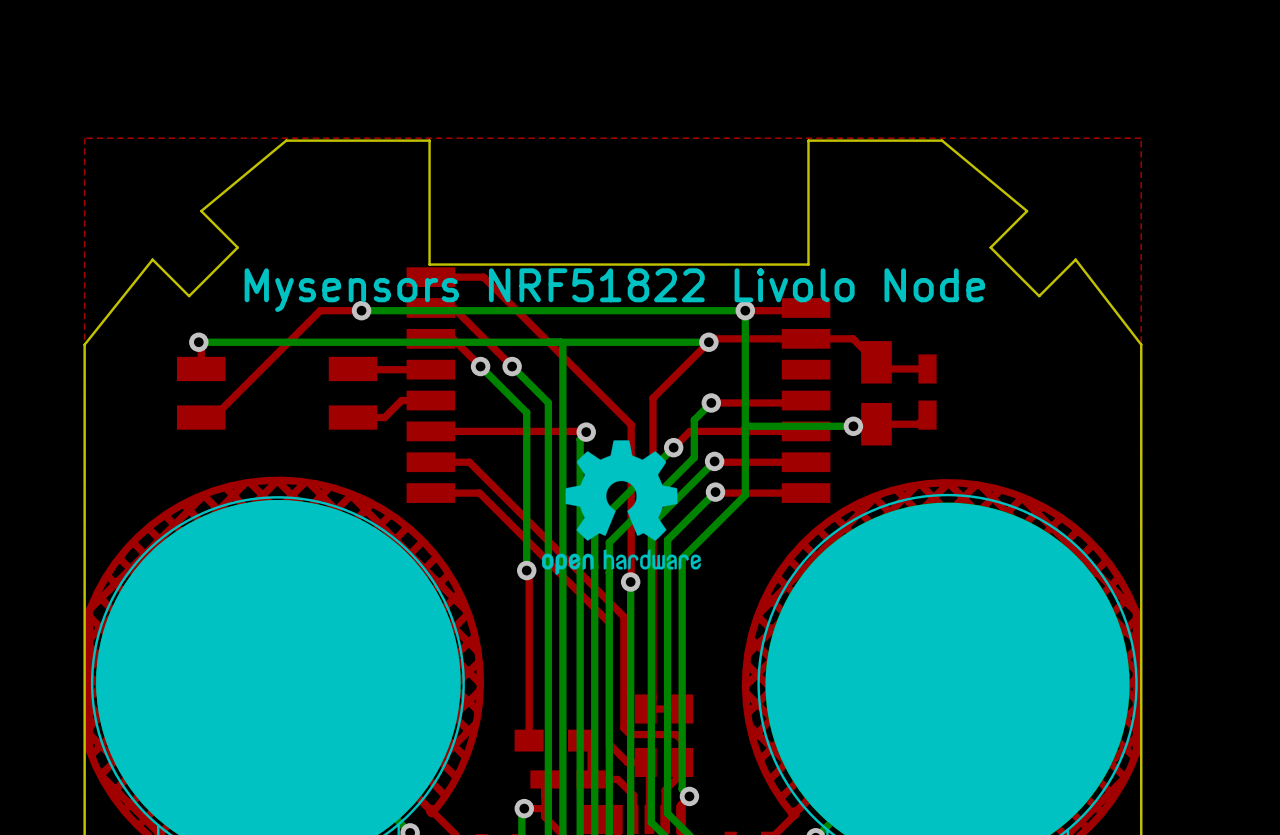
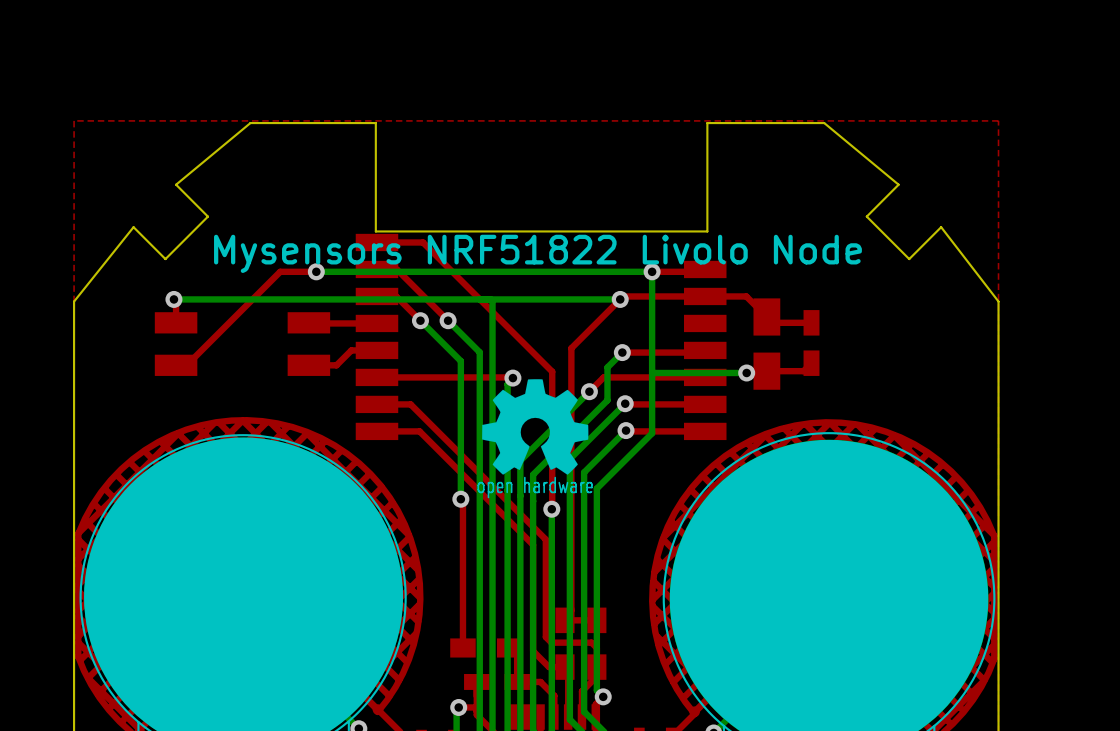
drawing shape: [542, 440, 701, 575] -> [477, 379, 593, 499]

